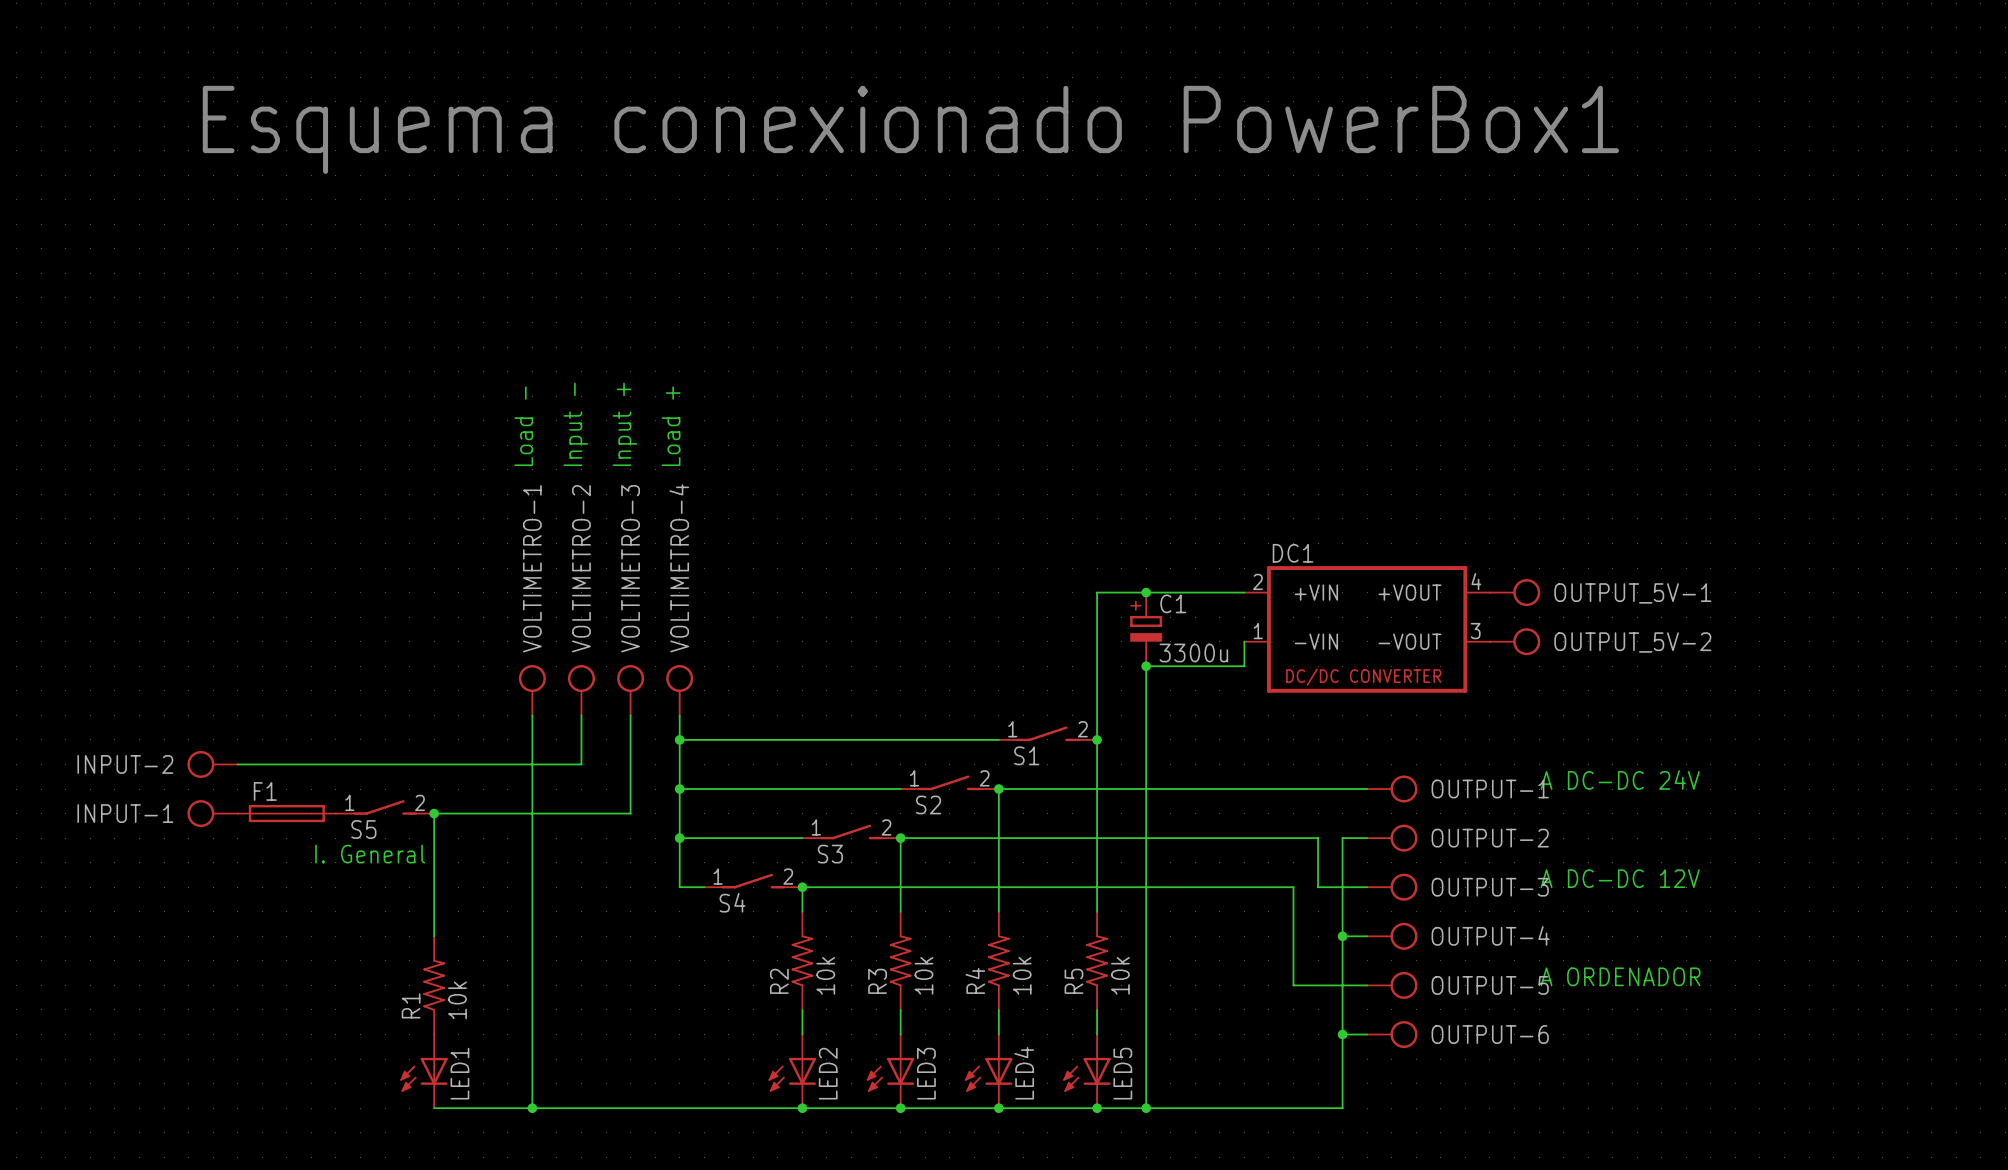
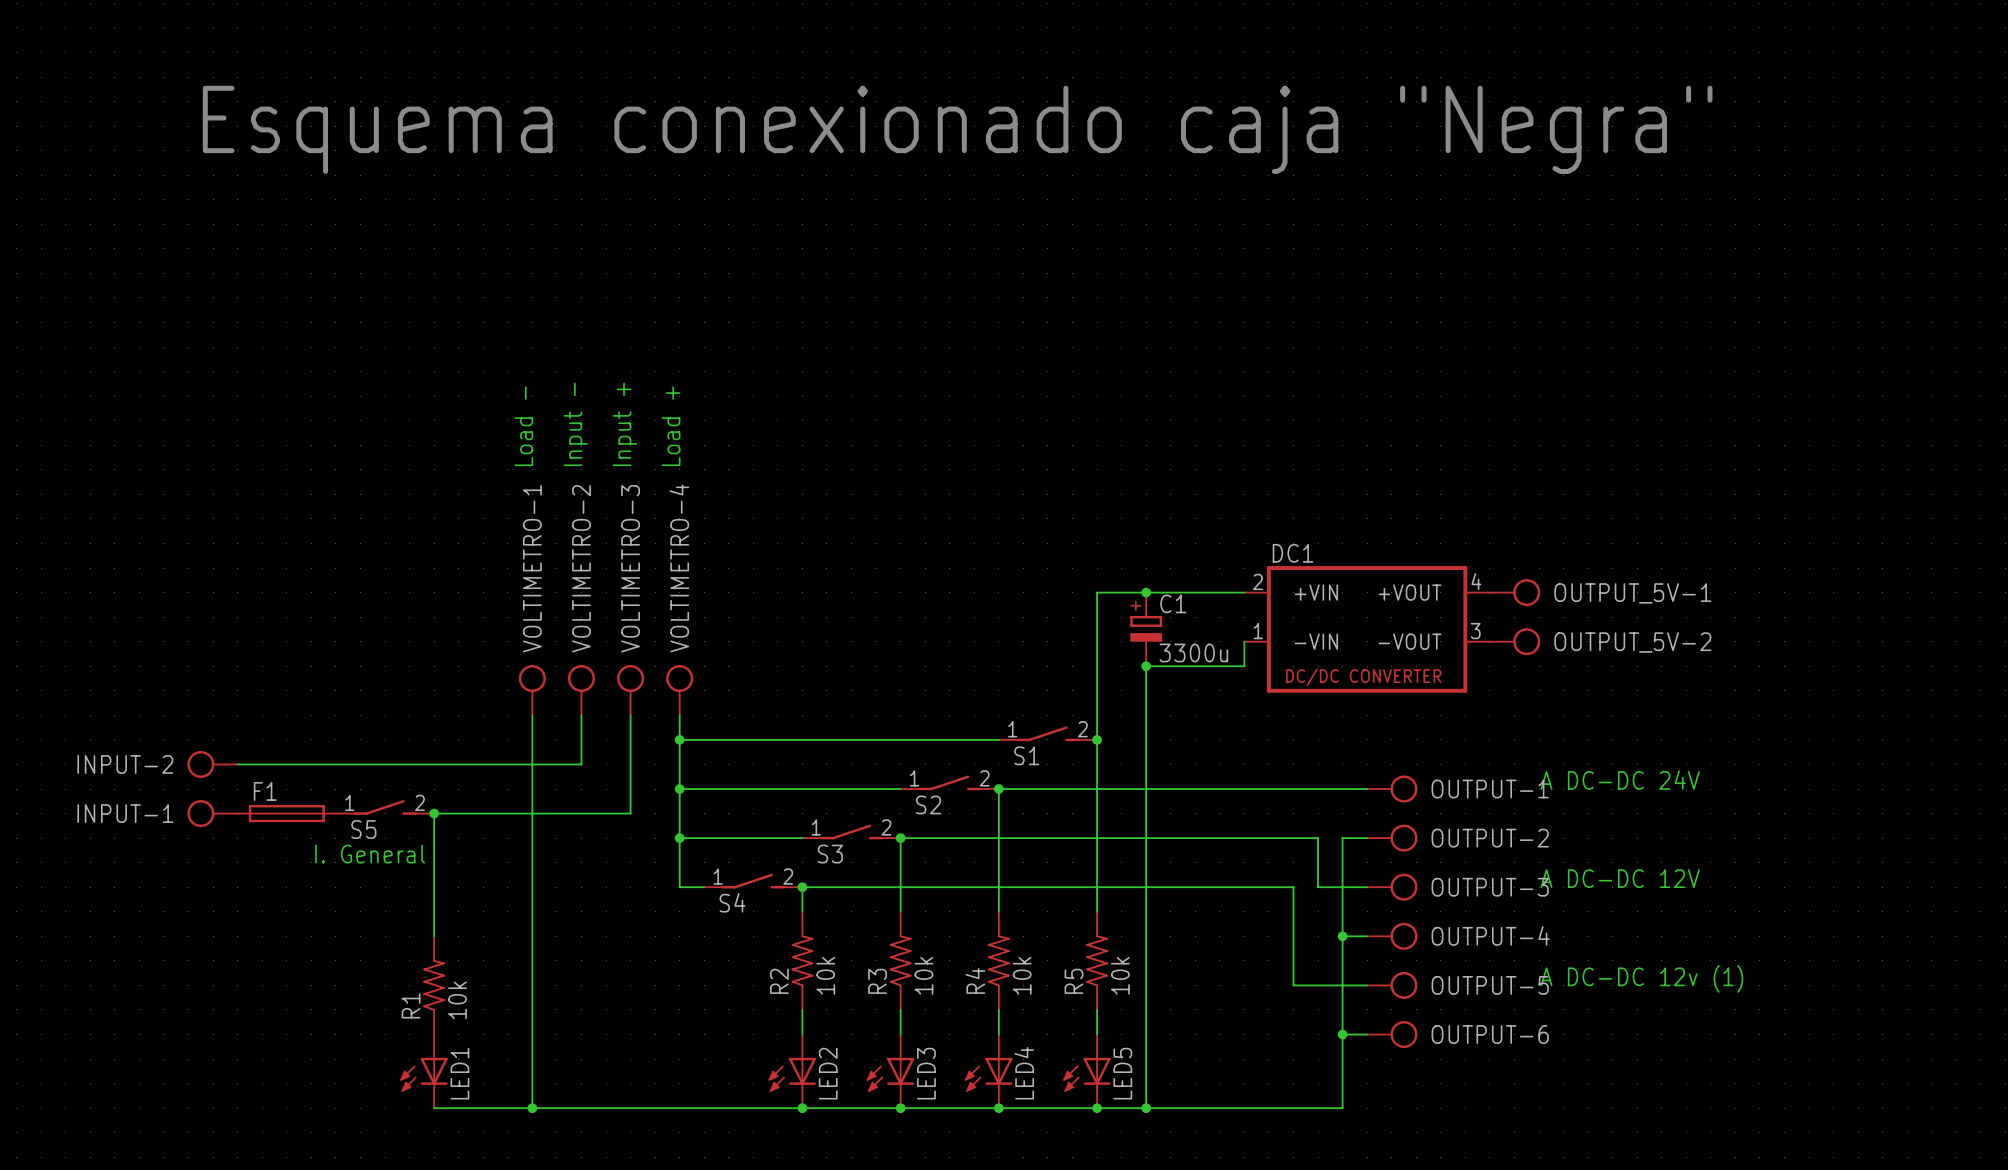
text: Esquema conexionado PowerBox1 (910, 129) -> Esquema conexionado caja "Negra" (957, 129)
text: A ORDENADOR (1620, 976) -> A DC-DC 12v (1) (1641, 978)

